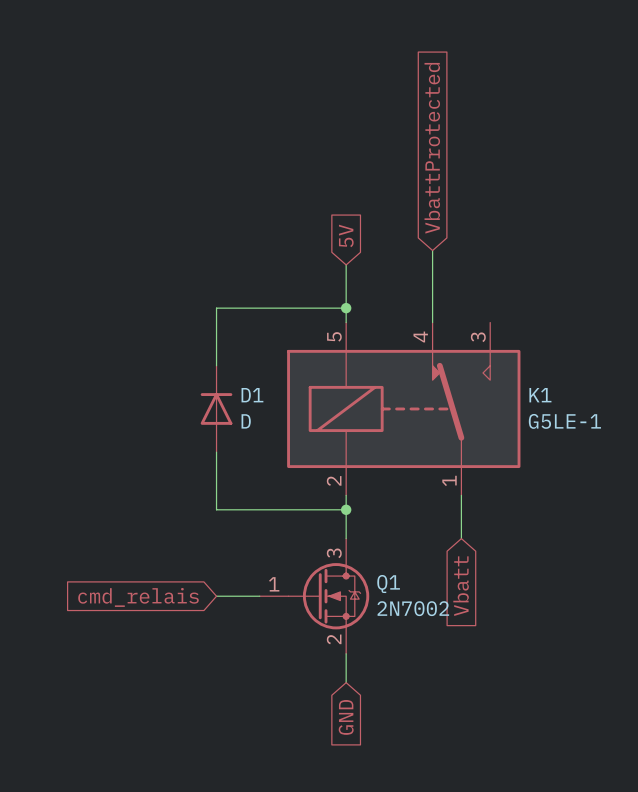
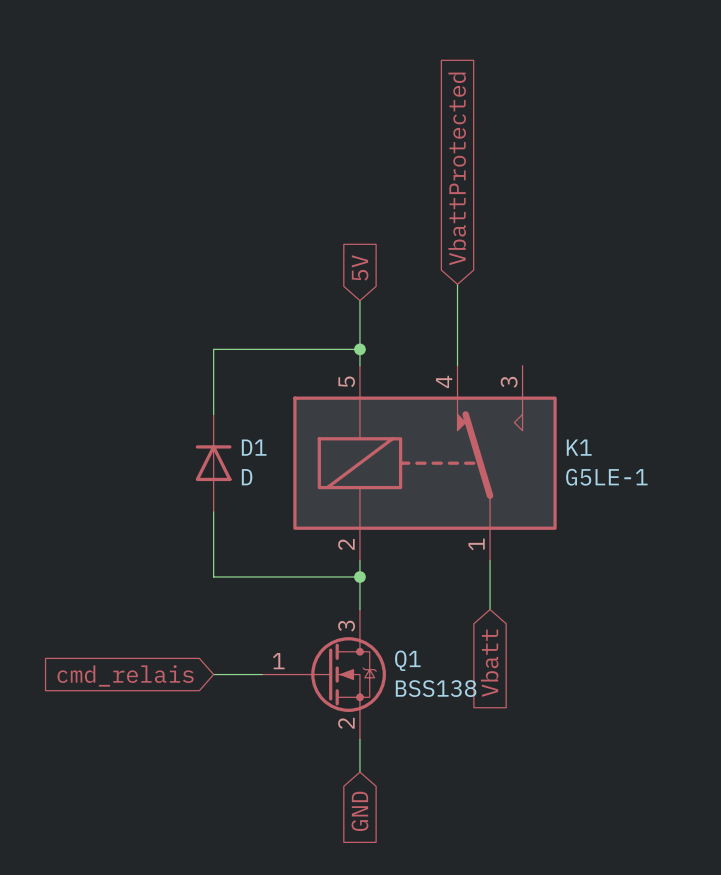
Q1 value: 2N7002 (413, 608) -> BSS138 (436, 688)

